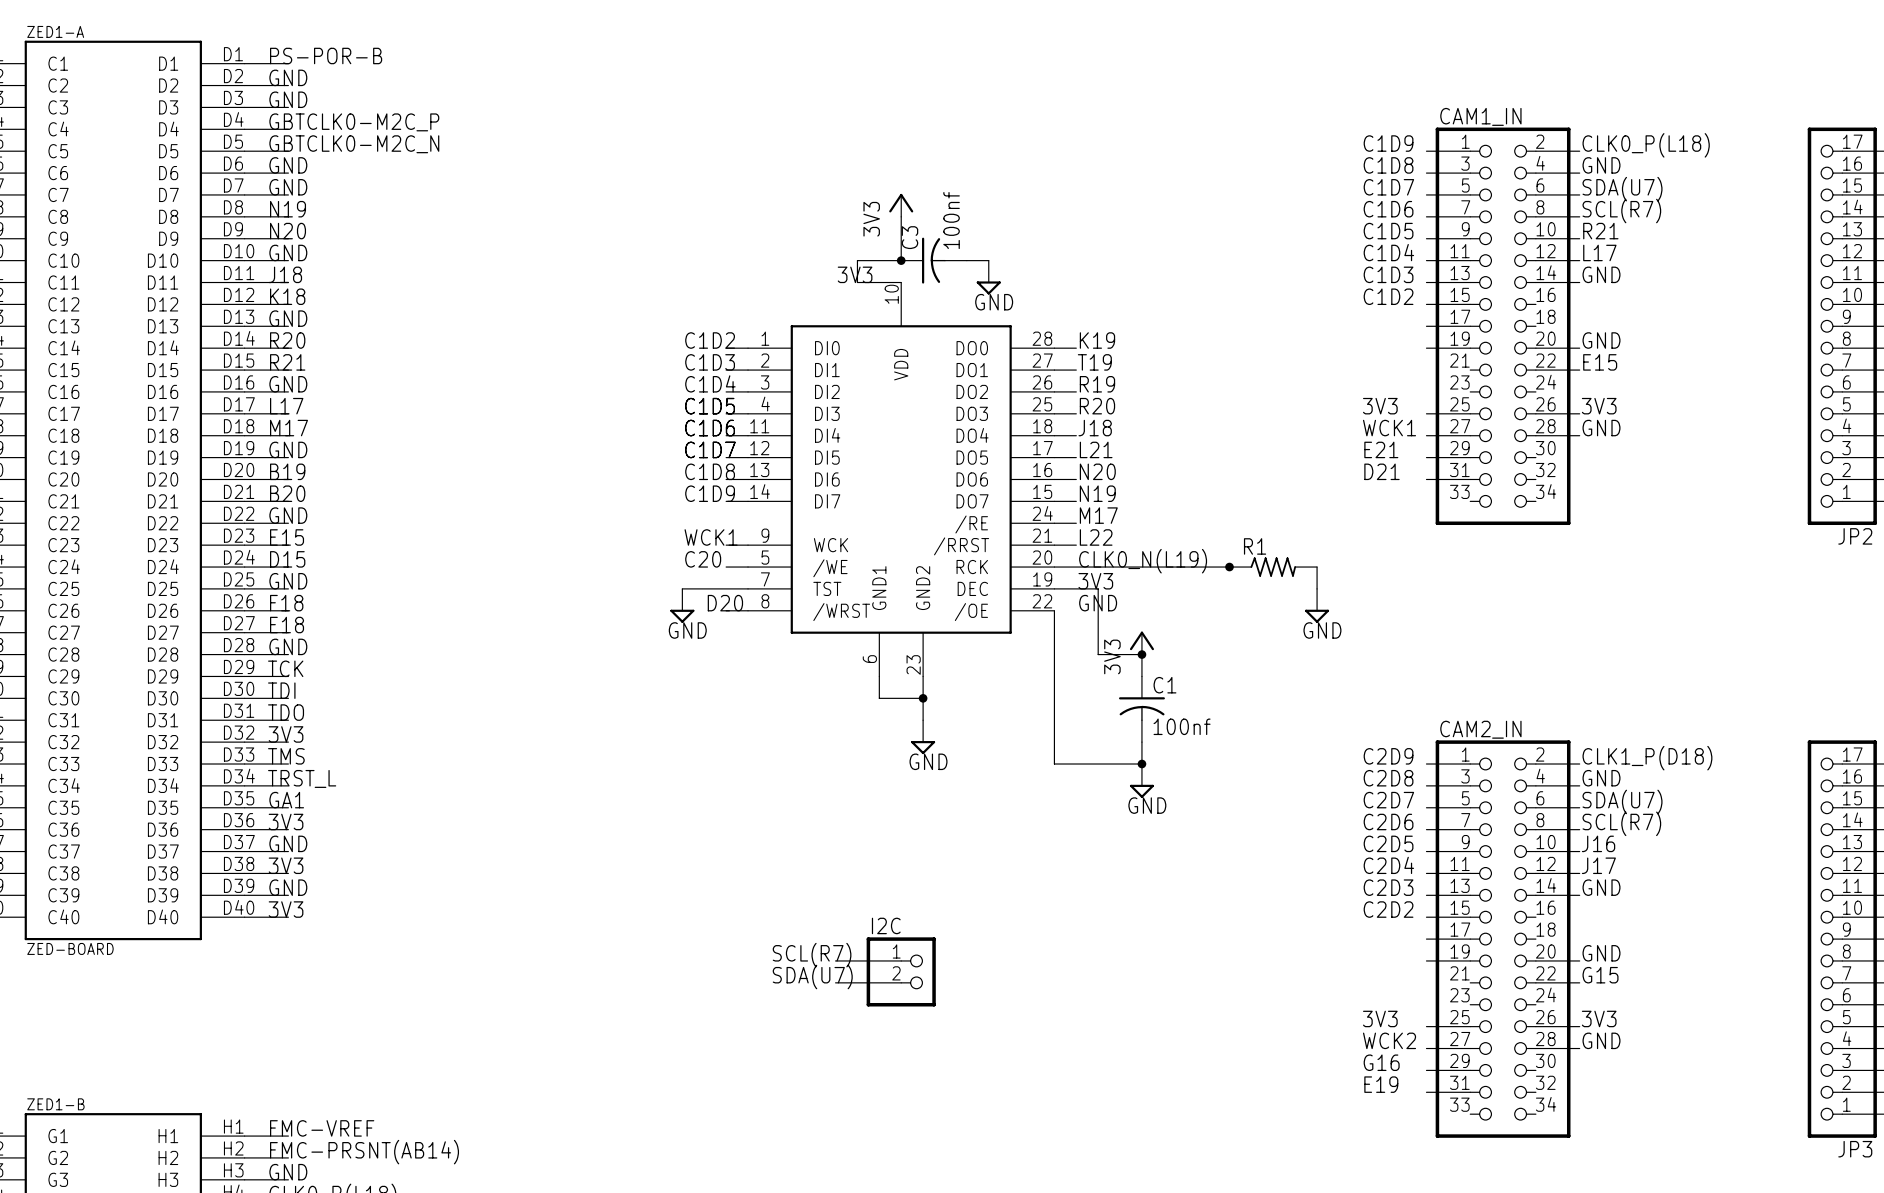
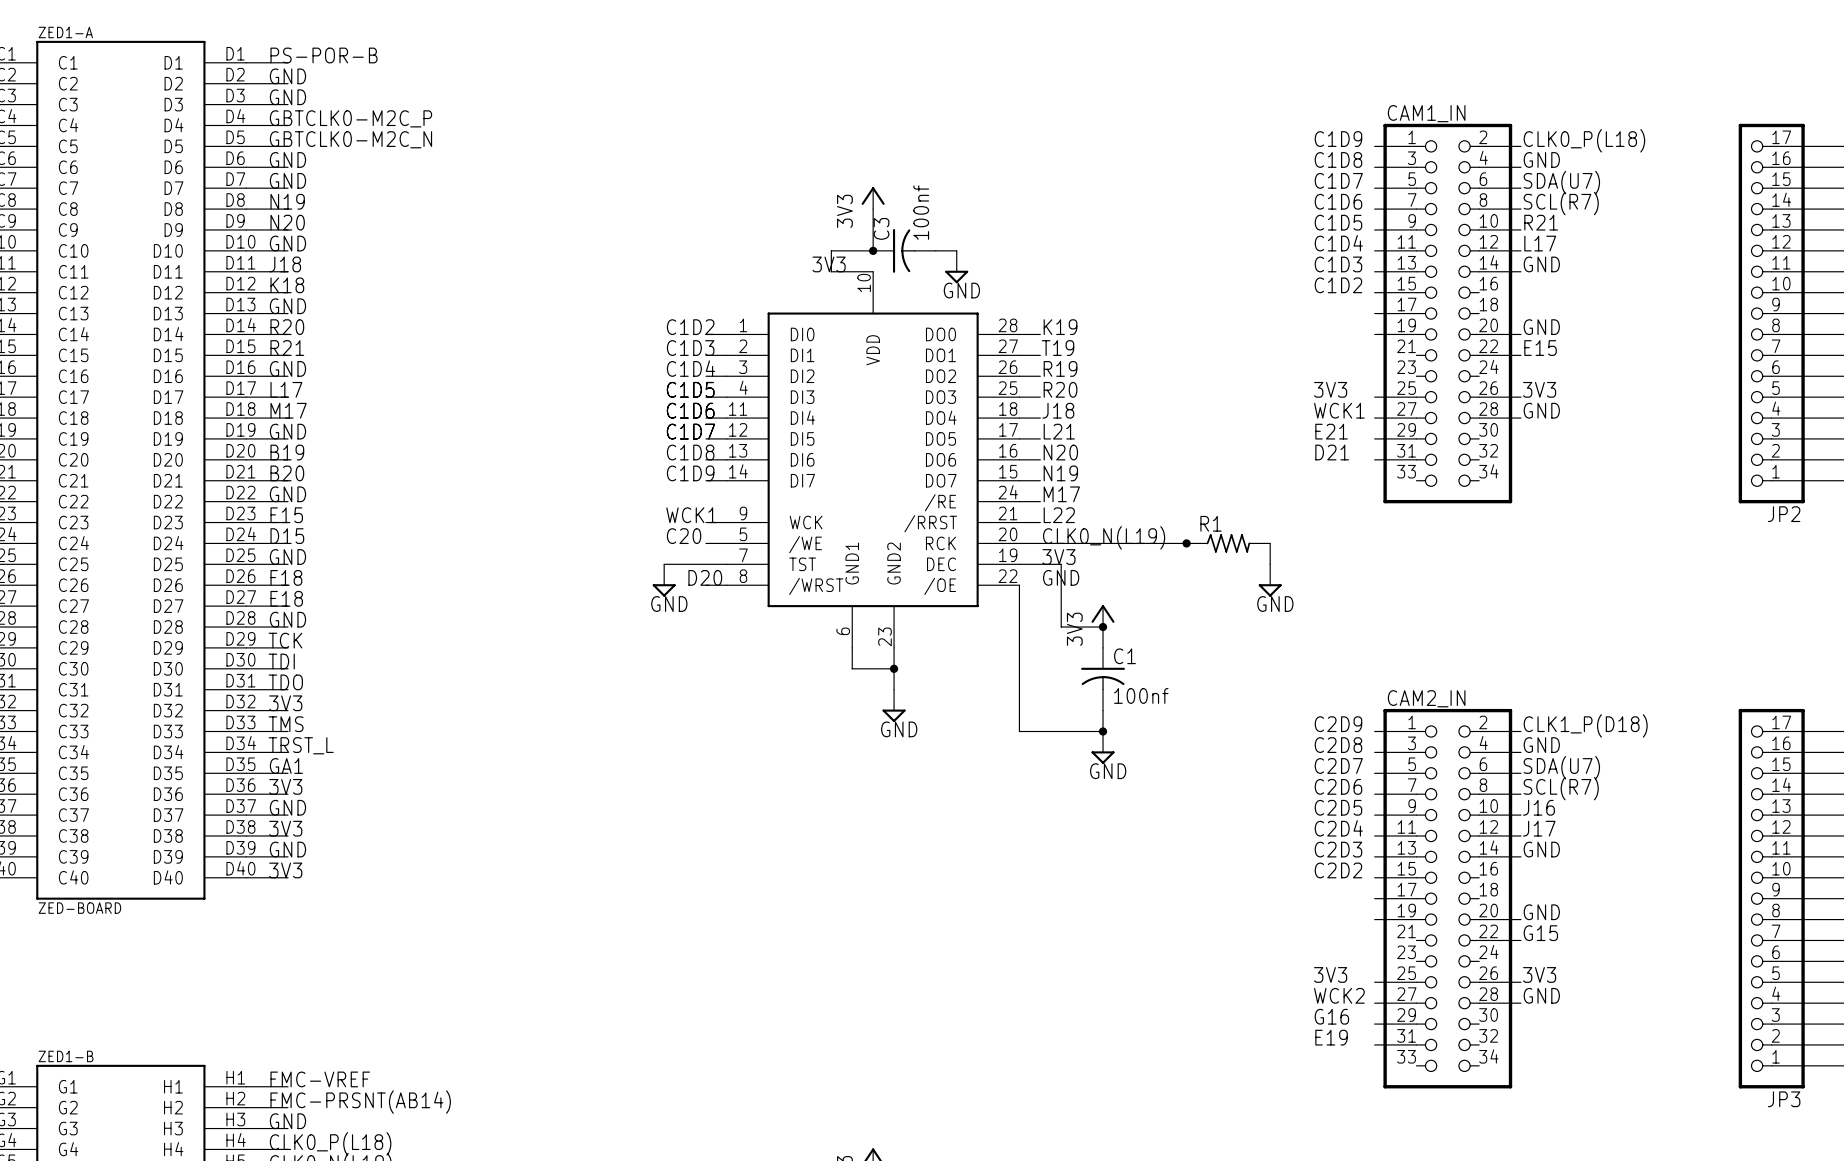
label: SCL(R7) (812, 955) -> none
wire: (835, 960) (901, 960) -> none
I2C: (901, 971) -> none
label: SDA(U7) (812, 977) -> none
wire: (835, 982) (901, 982) -> none

